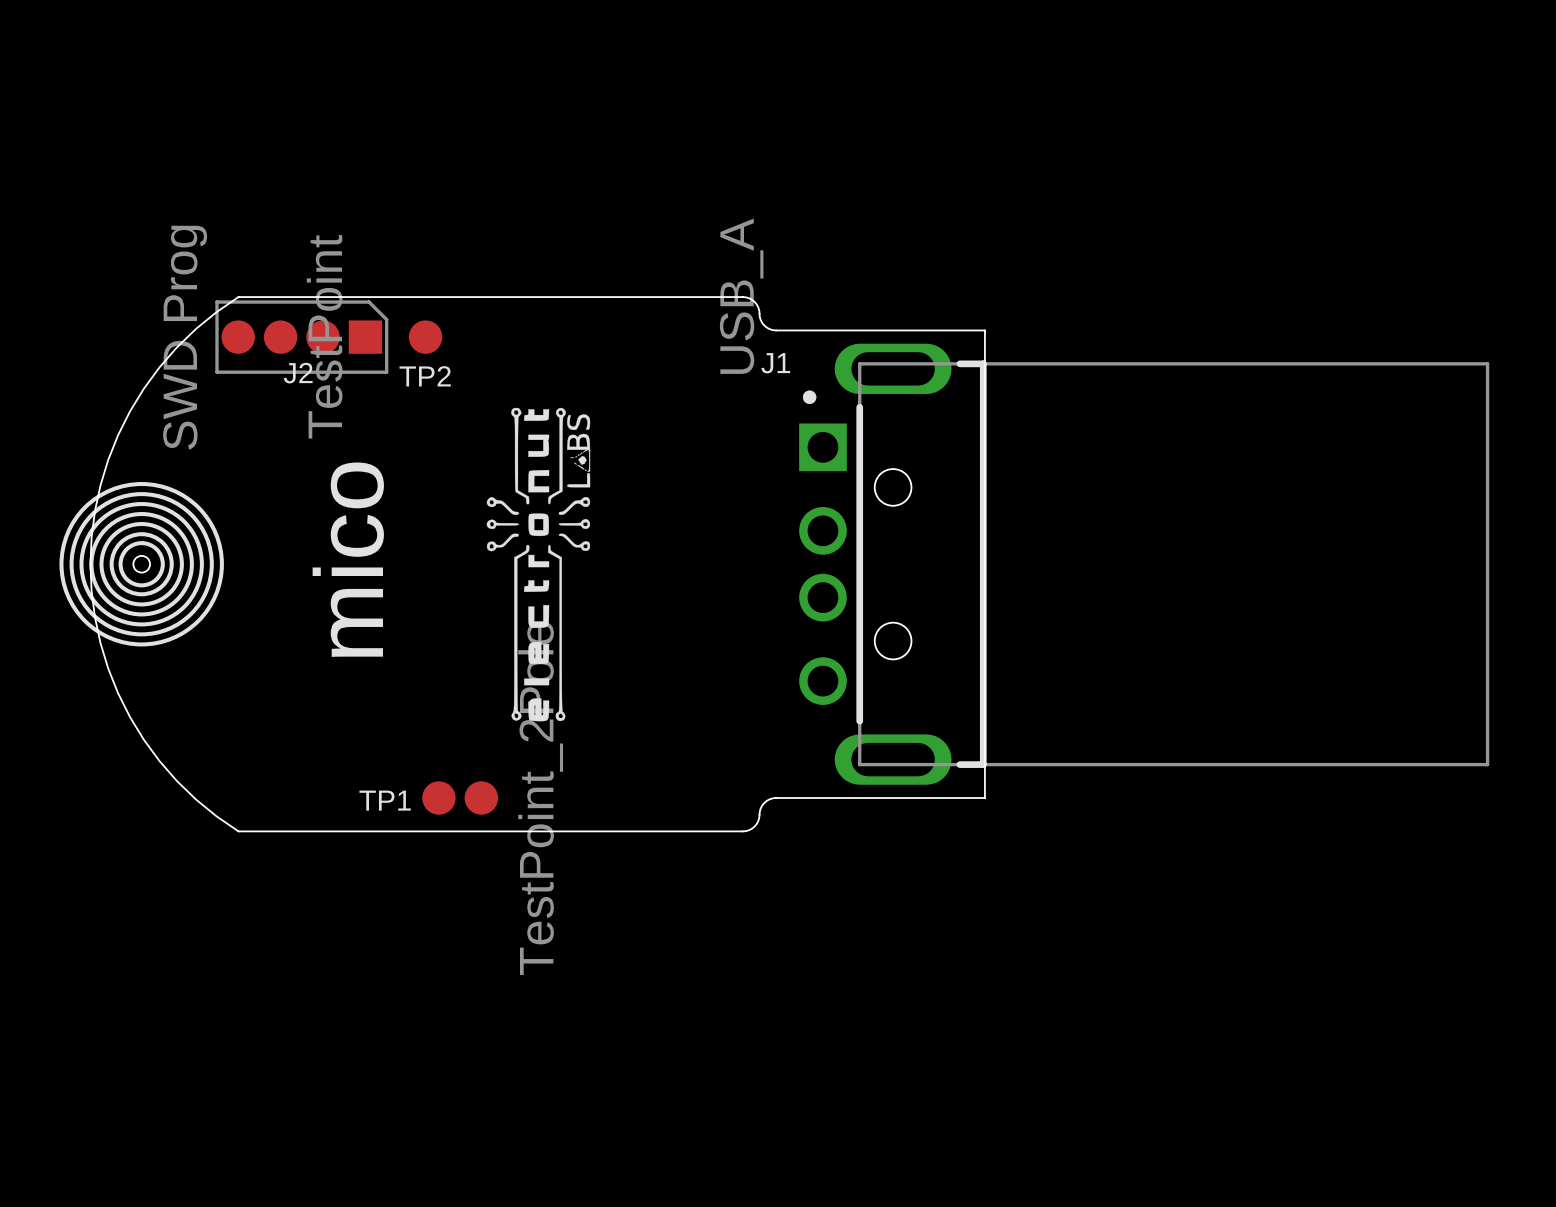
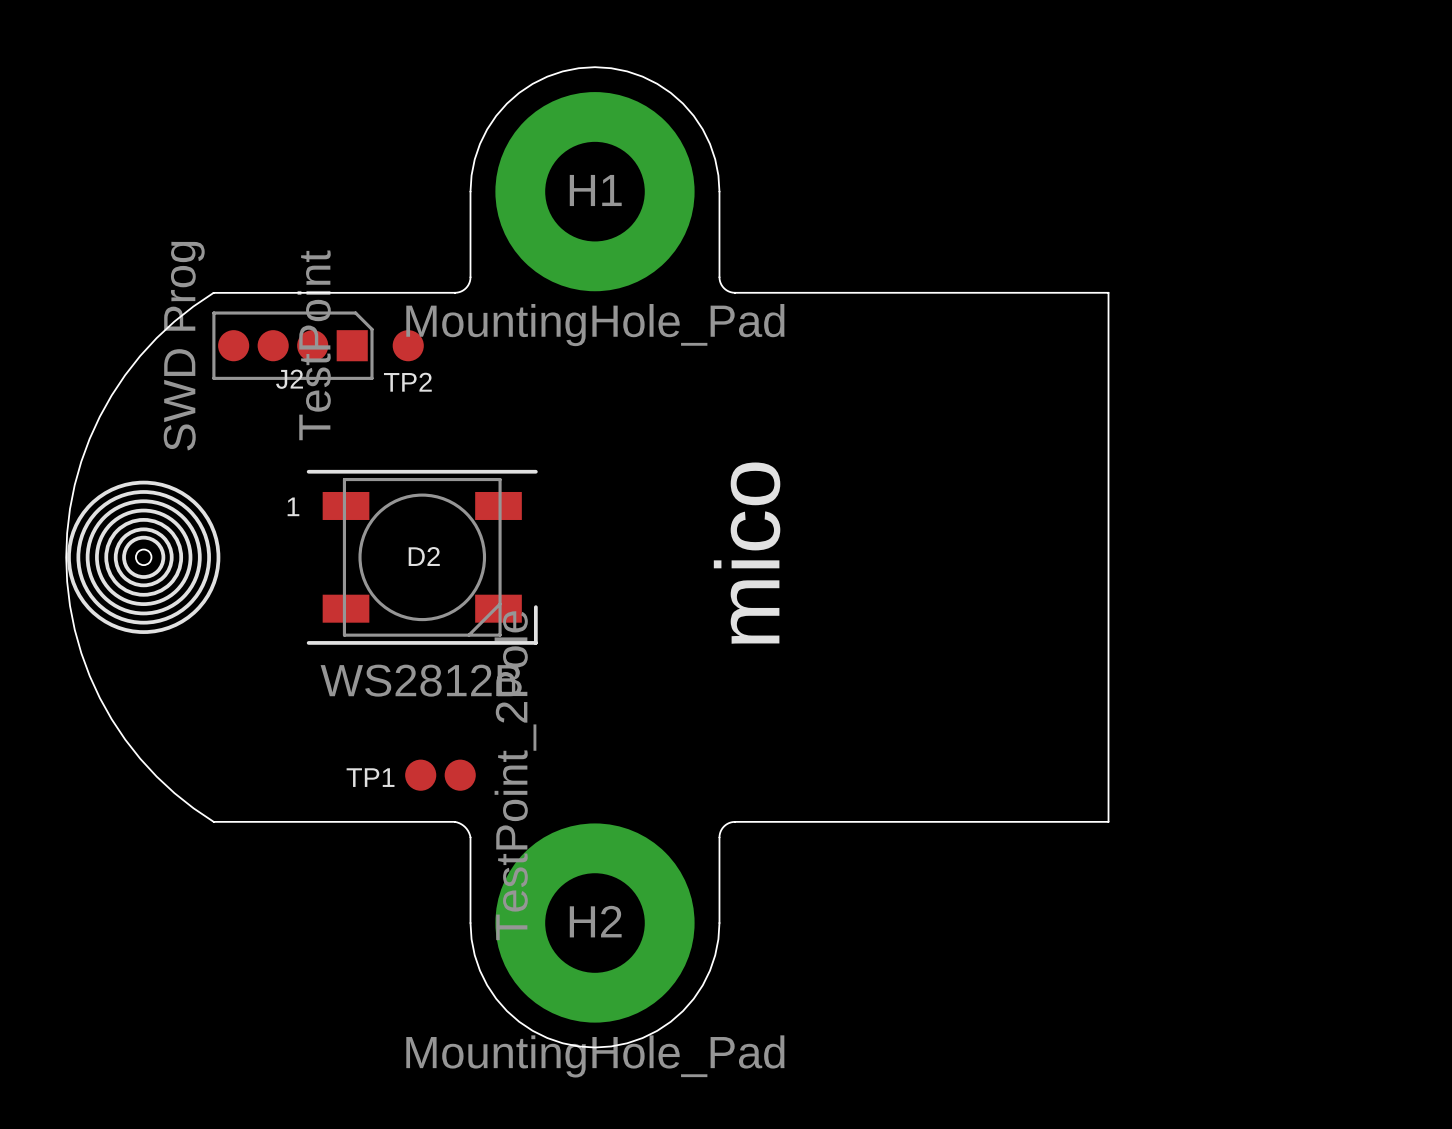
board edge: none -> (470, 191) (470, 279) (467, 286) (462, 290) (454, 292) (213, 292) (174, 321) (140, 356) (111, 395) (99, 416) (81, 461) (69, 508) (66, 557) (70, 605) (81, 653) (99, 698) (125, 739) (156, 776) (193, 808) (213, 821) (454, 821) (461, 824) (466, 828) (470, 837) (471, 939) (479, 970) (487, 985) (506, 1011) (532, 1030) (562, 1043) (594, 1047) (627, 1043) (657, 1030) (683, 1011) (702, 985) (710, 970) (718, 939) (719, 835) (722, 827) (729, 823) (1108, 821) (1108, 292) (729, 291) (722, 286) (719, 279) (718, 175) (710, 144) (702, 129) (693, 115) (670, 92) (642, 76) (611, 68) (578, 68) (562, 71) (547, 76) (519, 92) (496, 115) (487, 129) (474, 159) (470, 191)
H1: none -> MountingHole_Pad (594, 191)
board edge: (238, 297) (742, 297) (754, 301) (762, 323) (774, 330) (984, 330) (984, 798) (774, 798) (762, 804) (754, 826) (742, 831) (238, 831) (196, 799) (176, 781) (159, 761) (129, 716) (108, 668) (100, 643) (94, 617) (90, 564) (91, 537) (100, 485) (108, 459) (129, 411) (143, 388) (176, 347) (196, 328) (238, 297) -> none
drawing: [486, 407, 591, 722] -> none
text position: mico (348, 559) -> mico (747, 553)
D2: none -> WS2812B (422, 557)
J1: USB_A (1144, 564) -> none
H2: none -> MountingHole_Pad (594, 923)

